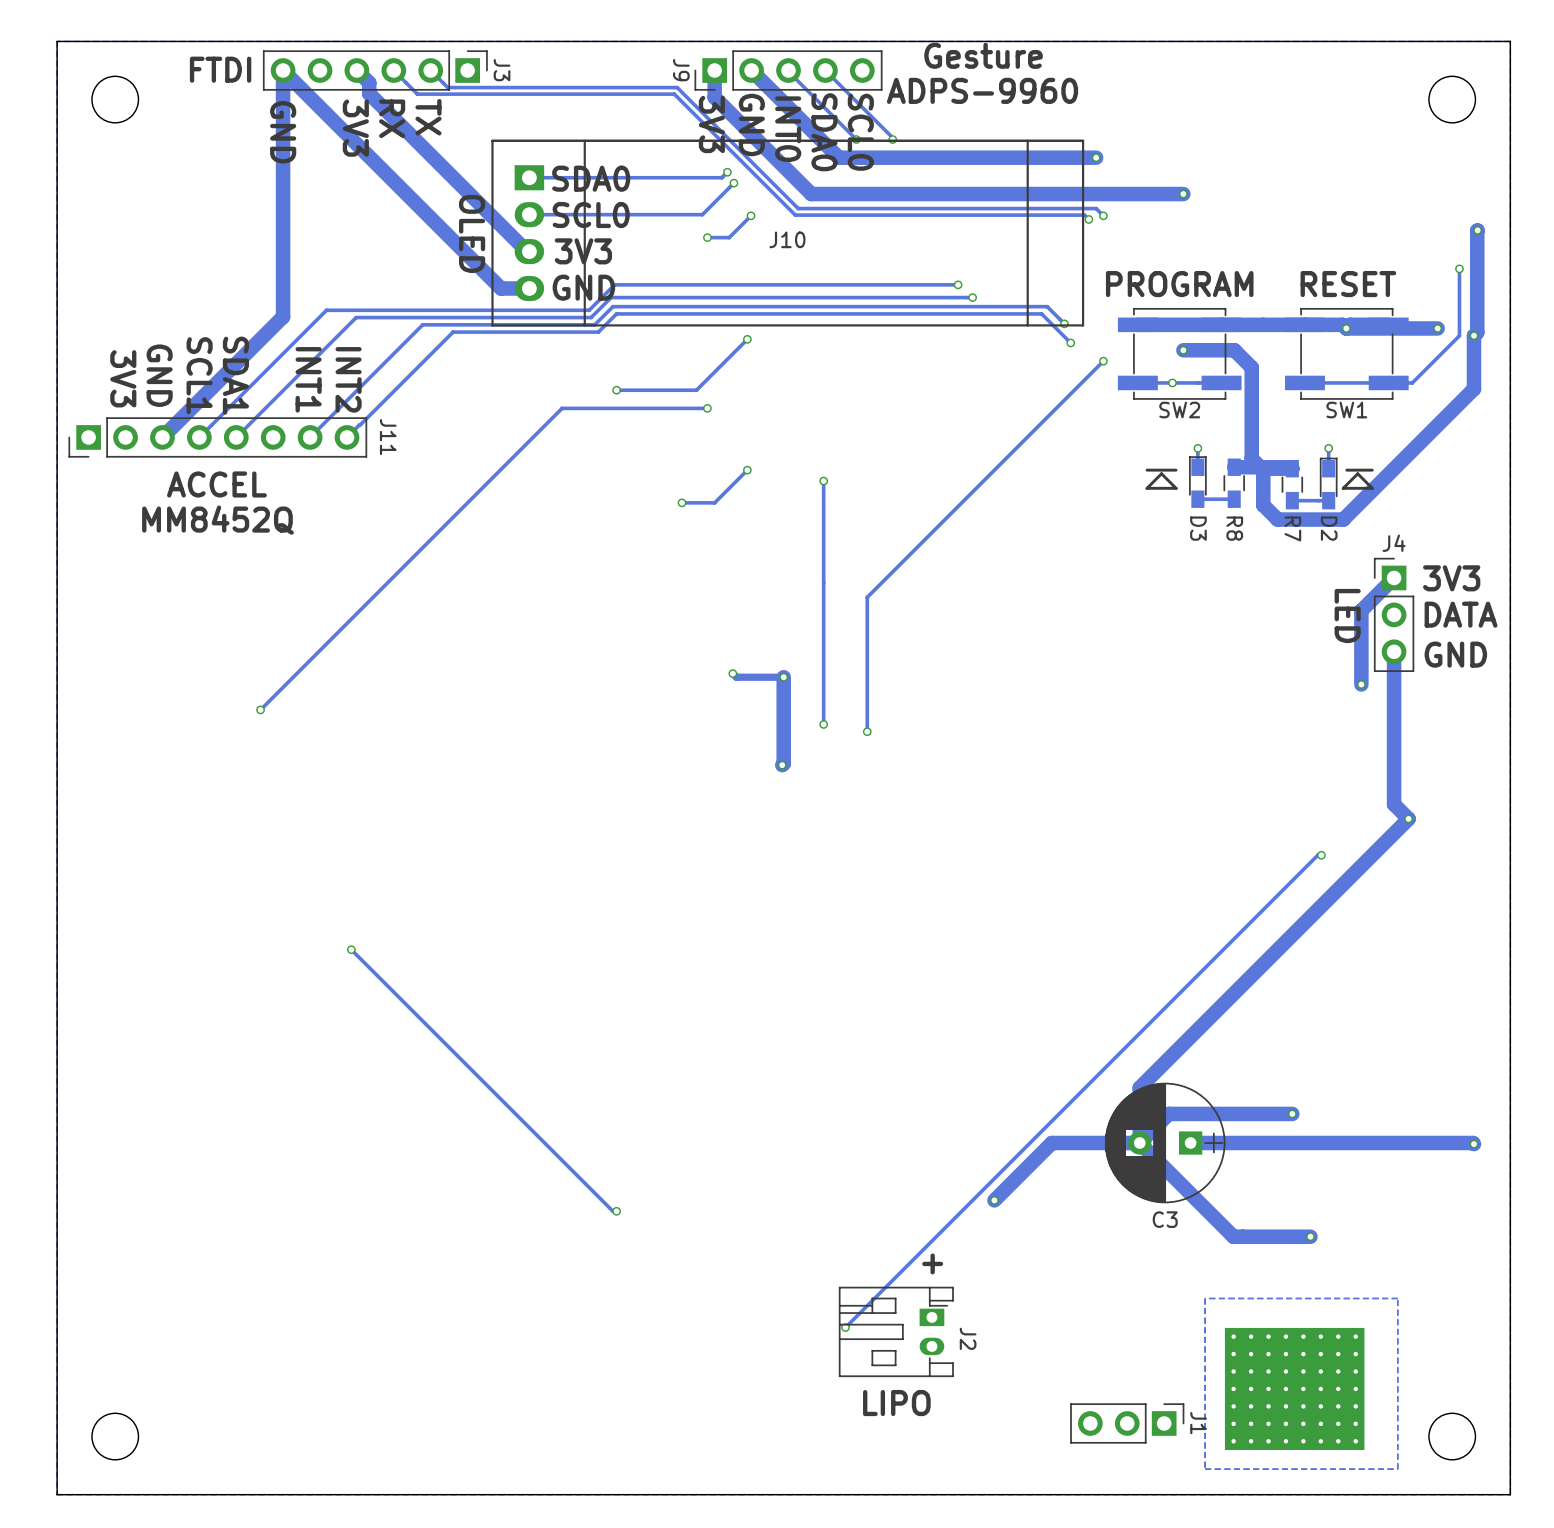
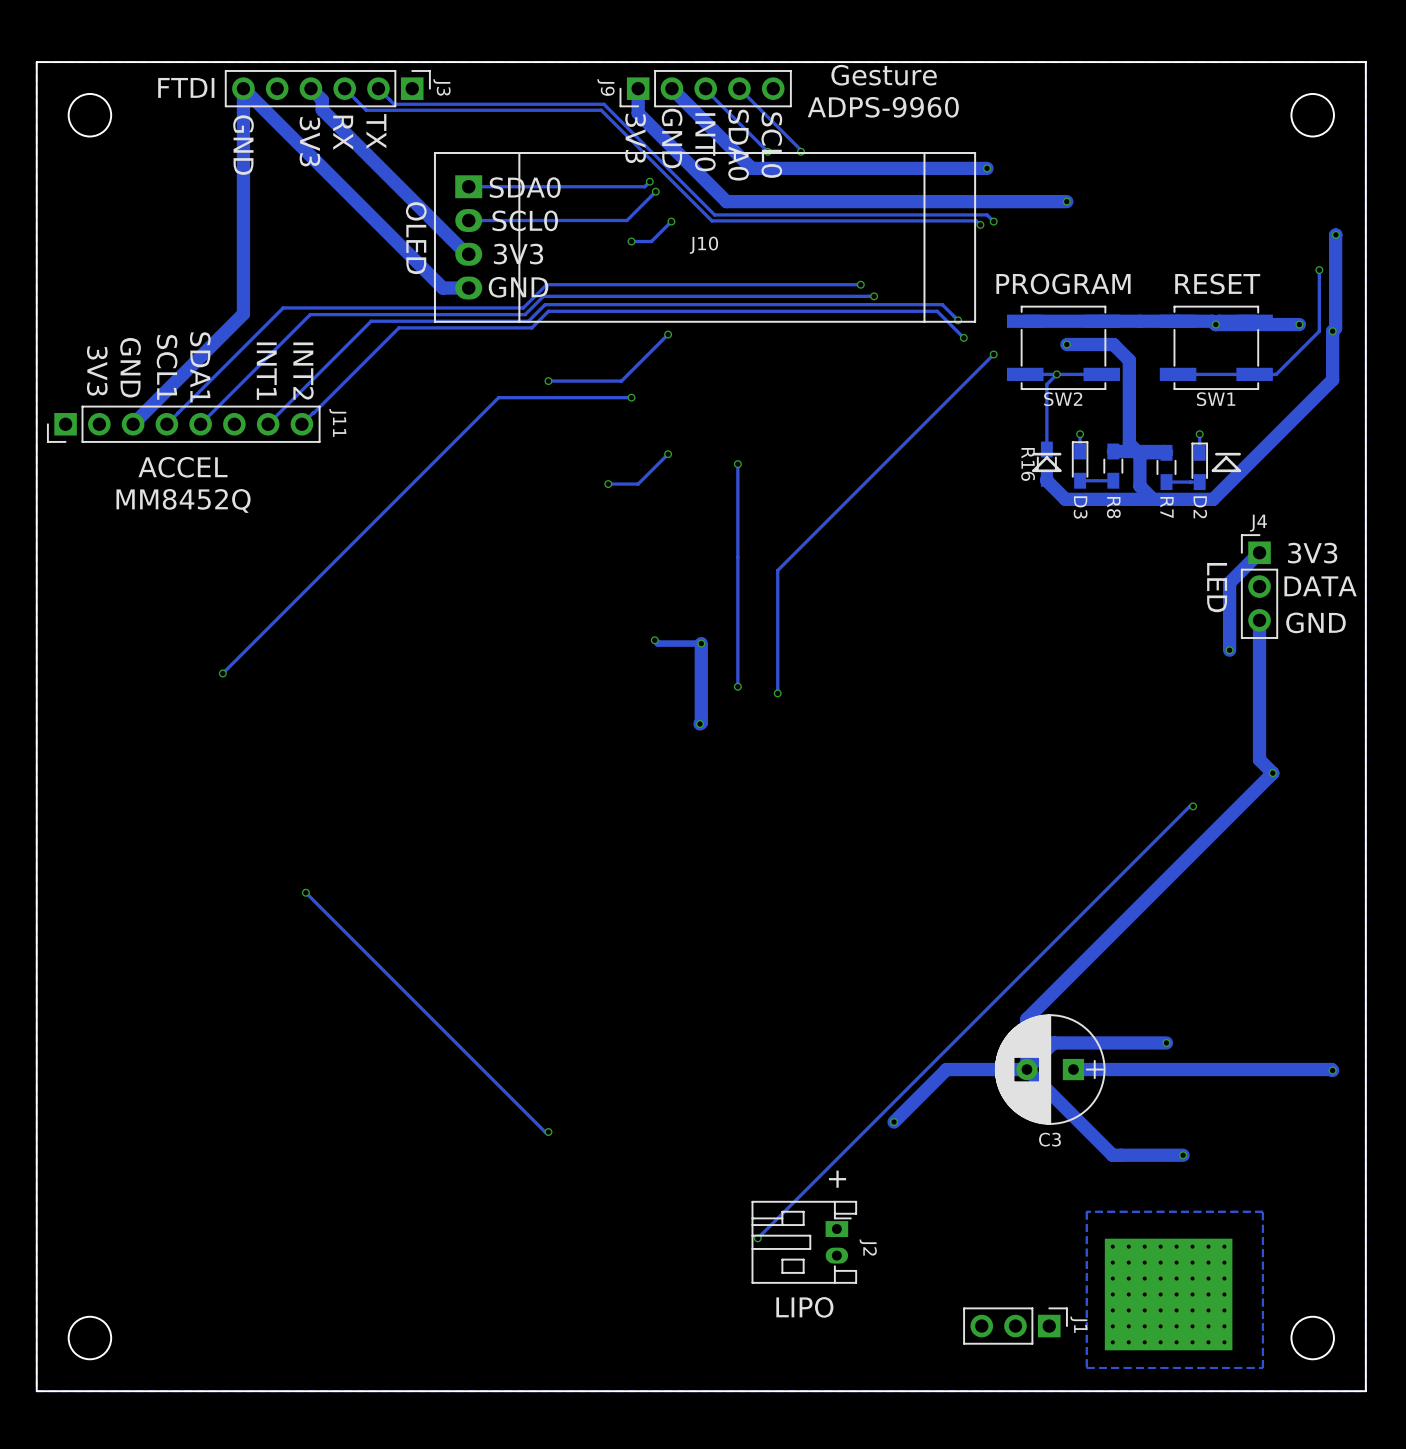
track: none -> (1056, 374) (1046, 384) (1046, 449)
R16: none -> (1046, 464)
track: none -> (1046, 478) (1065, 499) (1153, 499)

